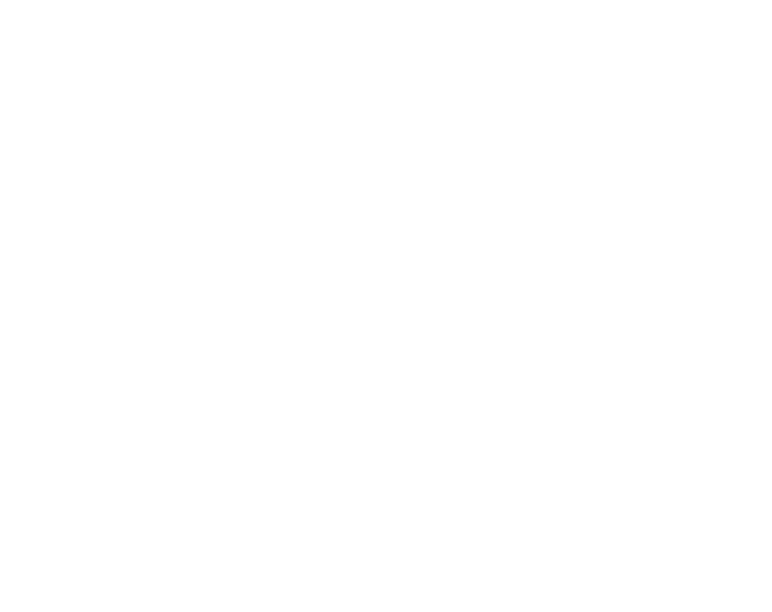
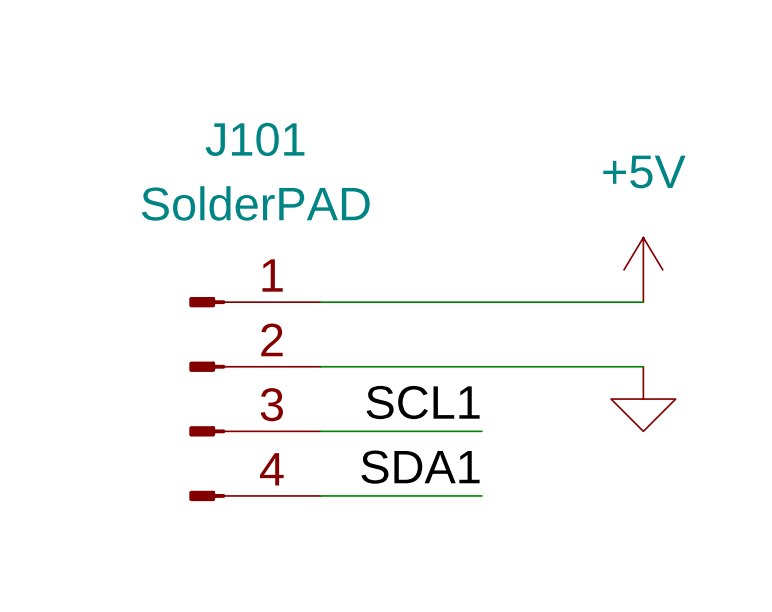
power symbol: none -> +5V (643, 269)
wire: none -> (320, 302) (643, 302)
wire: none -> (320, 366) (643, 366)
J101: none -> SolderPAD (254, 399)
power symbol: none -> (643, 399)
label: none -> SCL1 (423, 402)
wire: none -> (320, 431) (481, 431)
label: none -> SDA1 (420, 467)
wire: none -> (320, 495) (481, 495)

